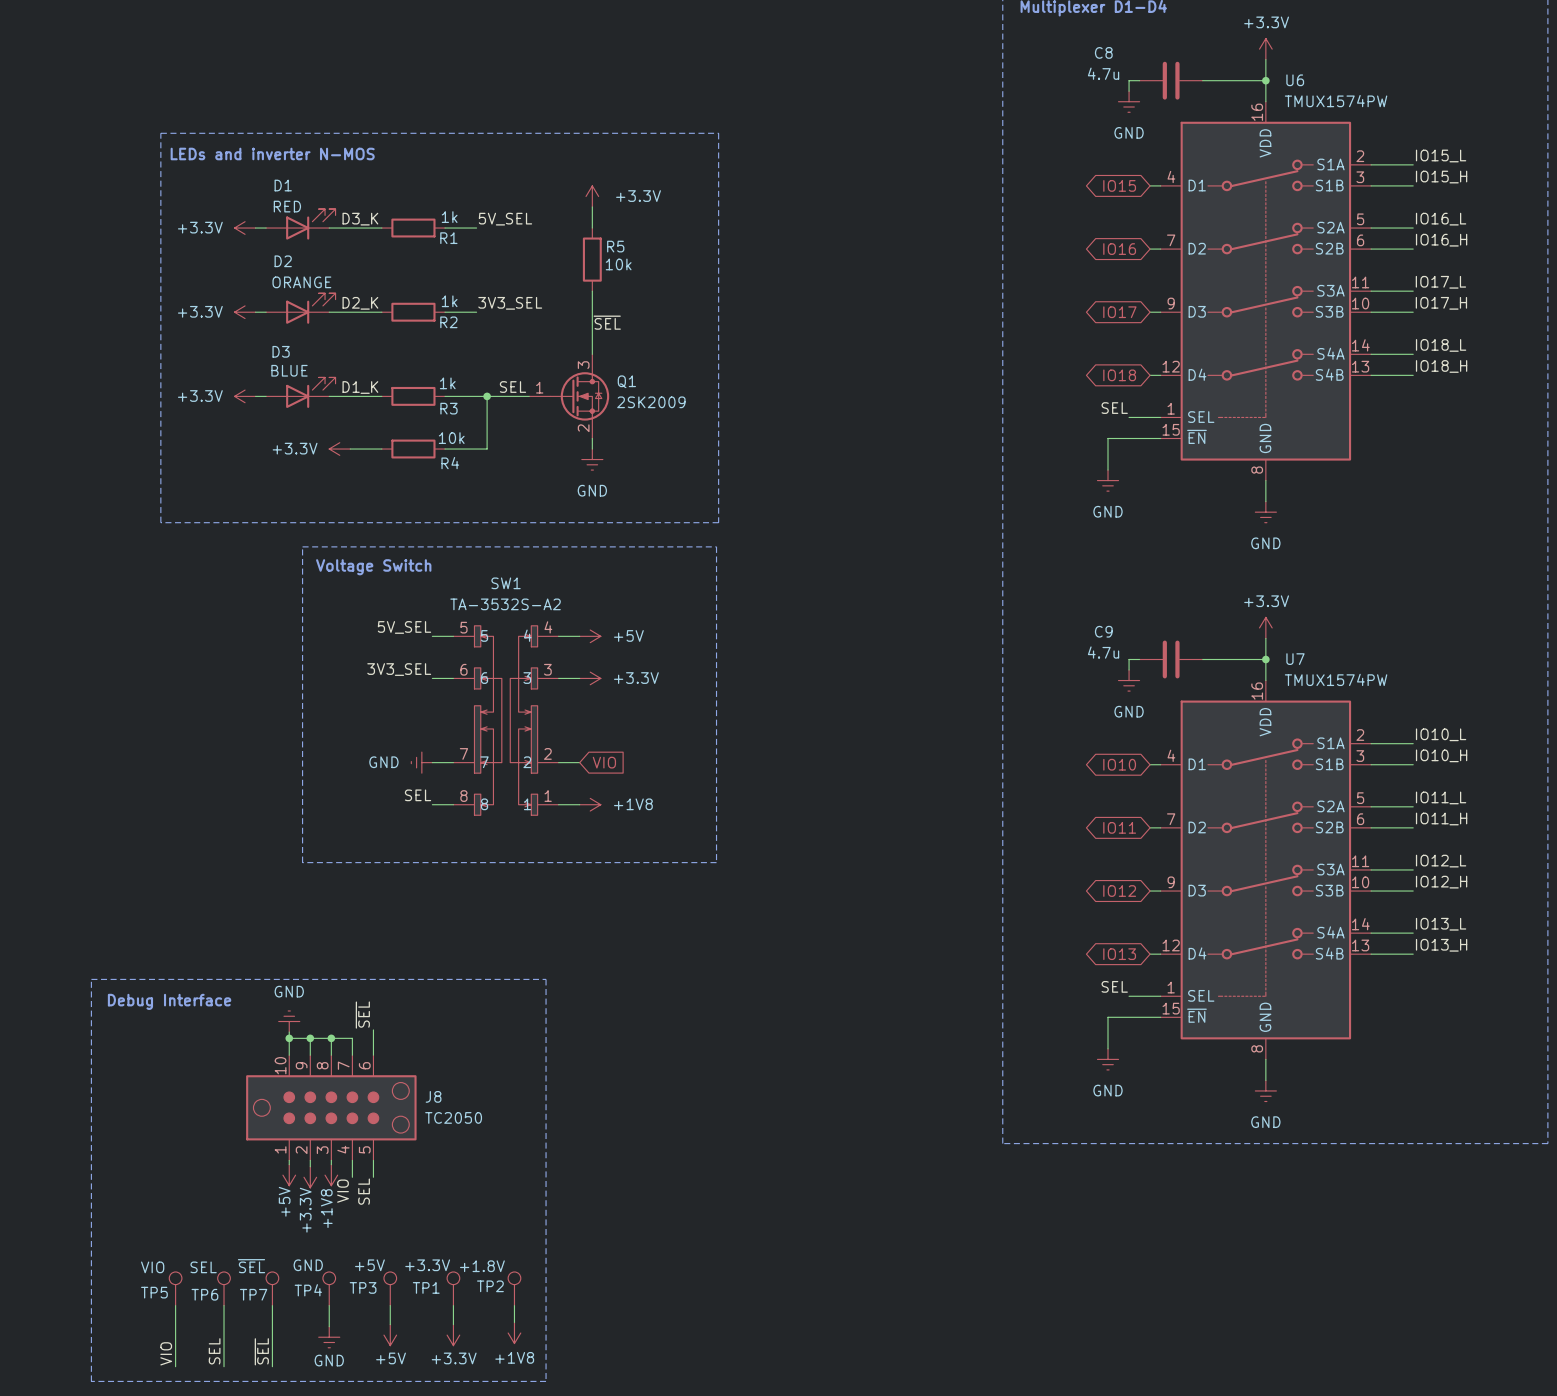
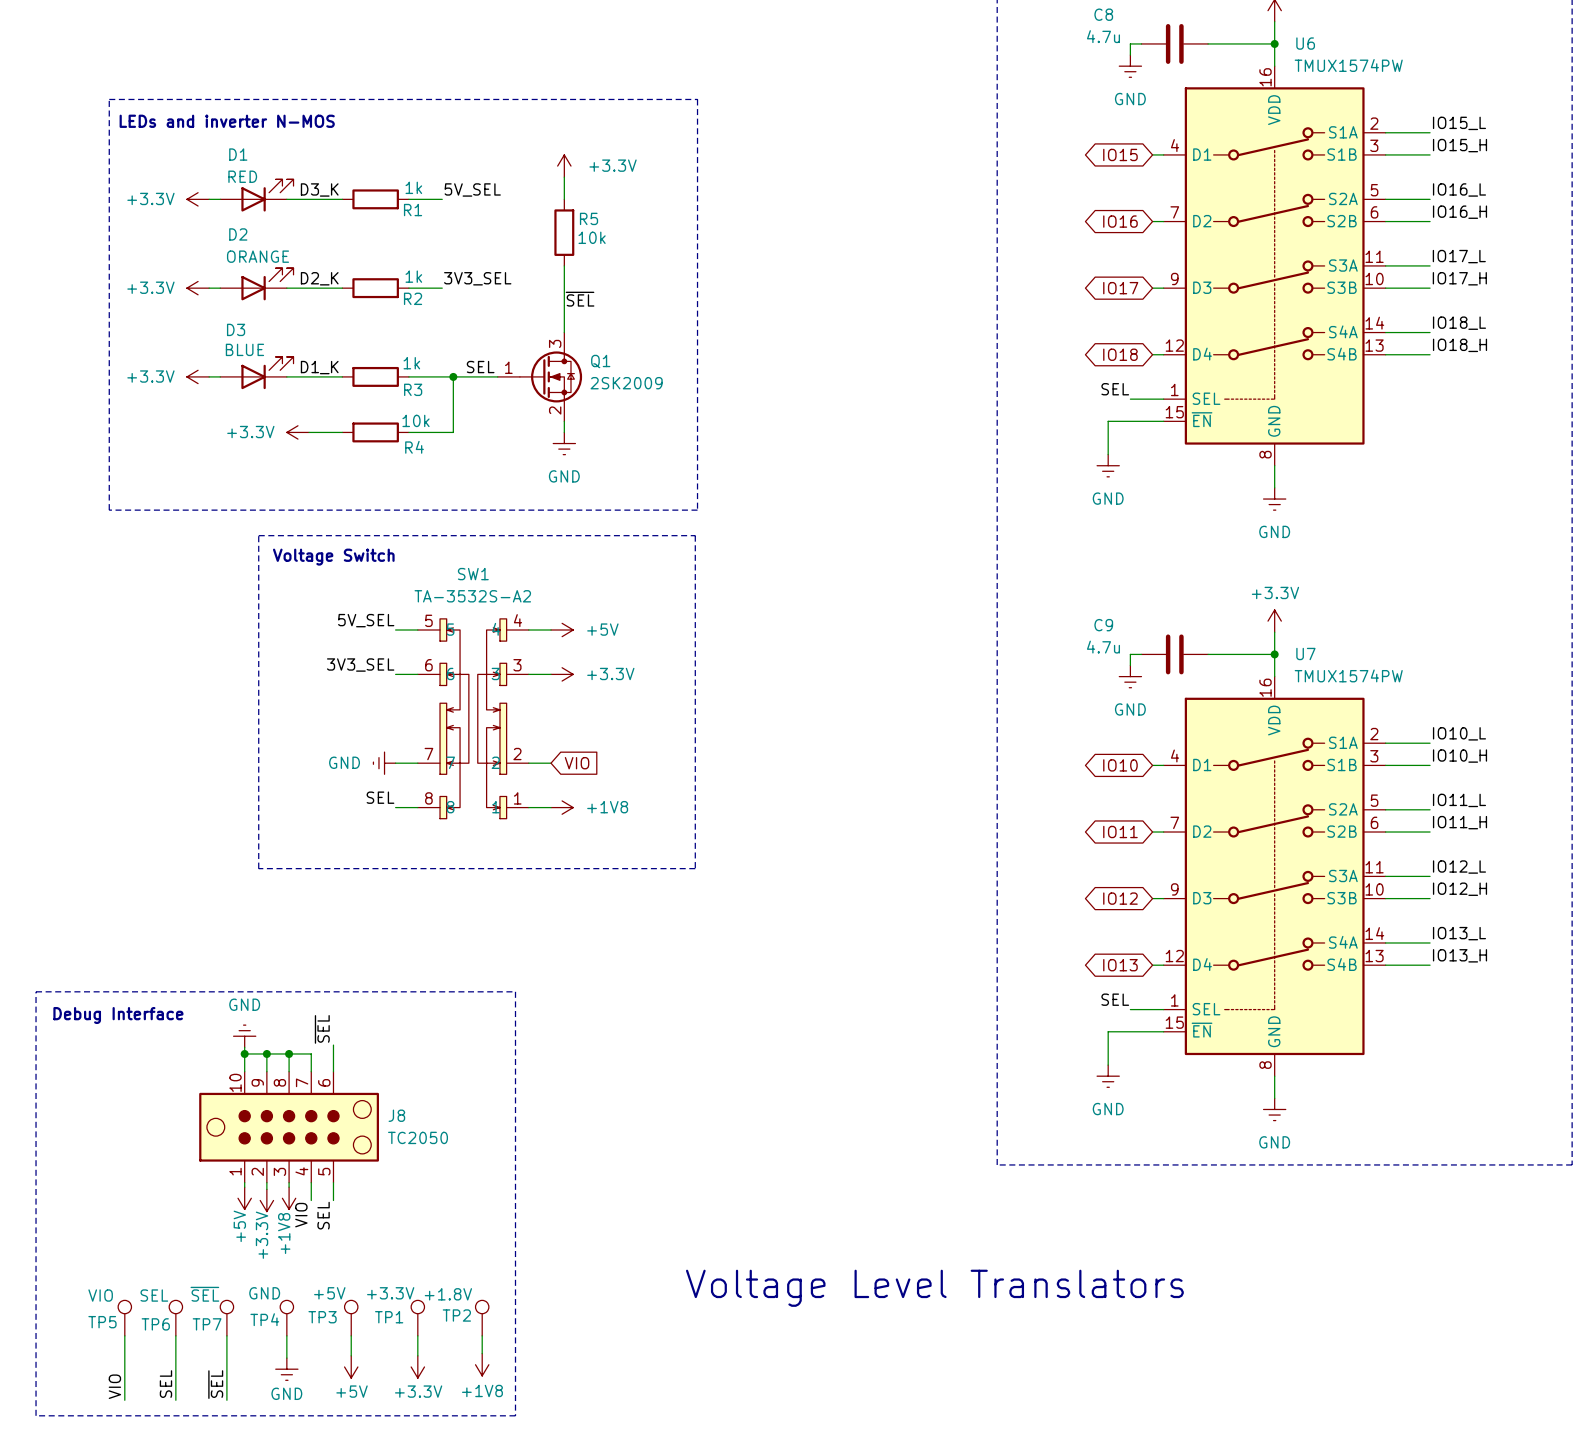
text: none -> Voltage Level Translators (934, 1288)

